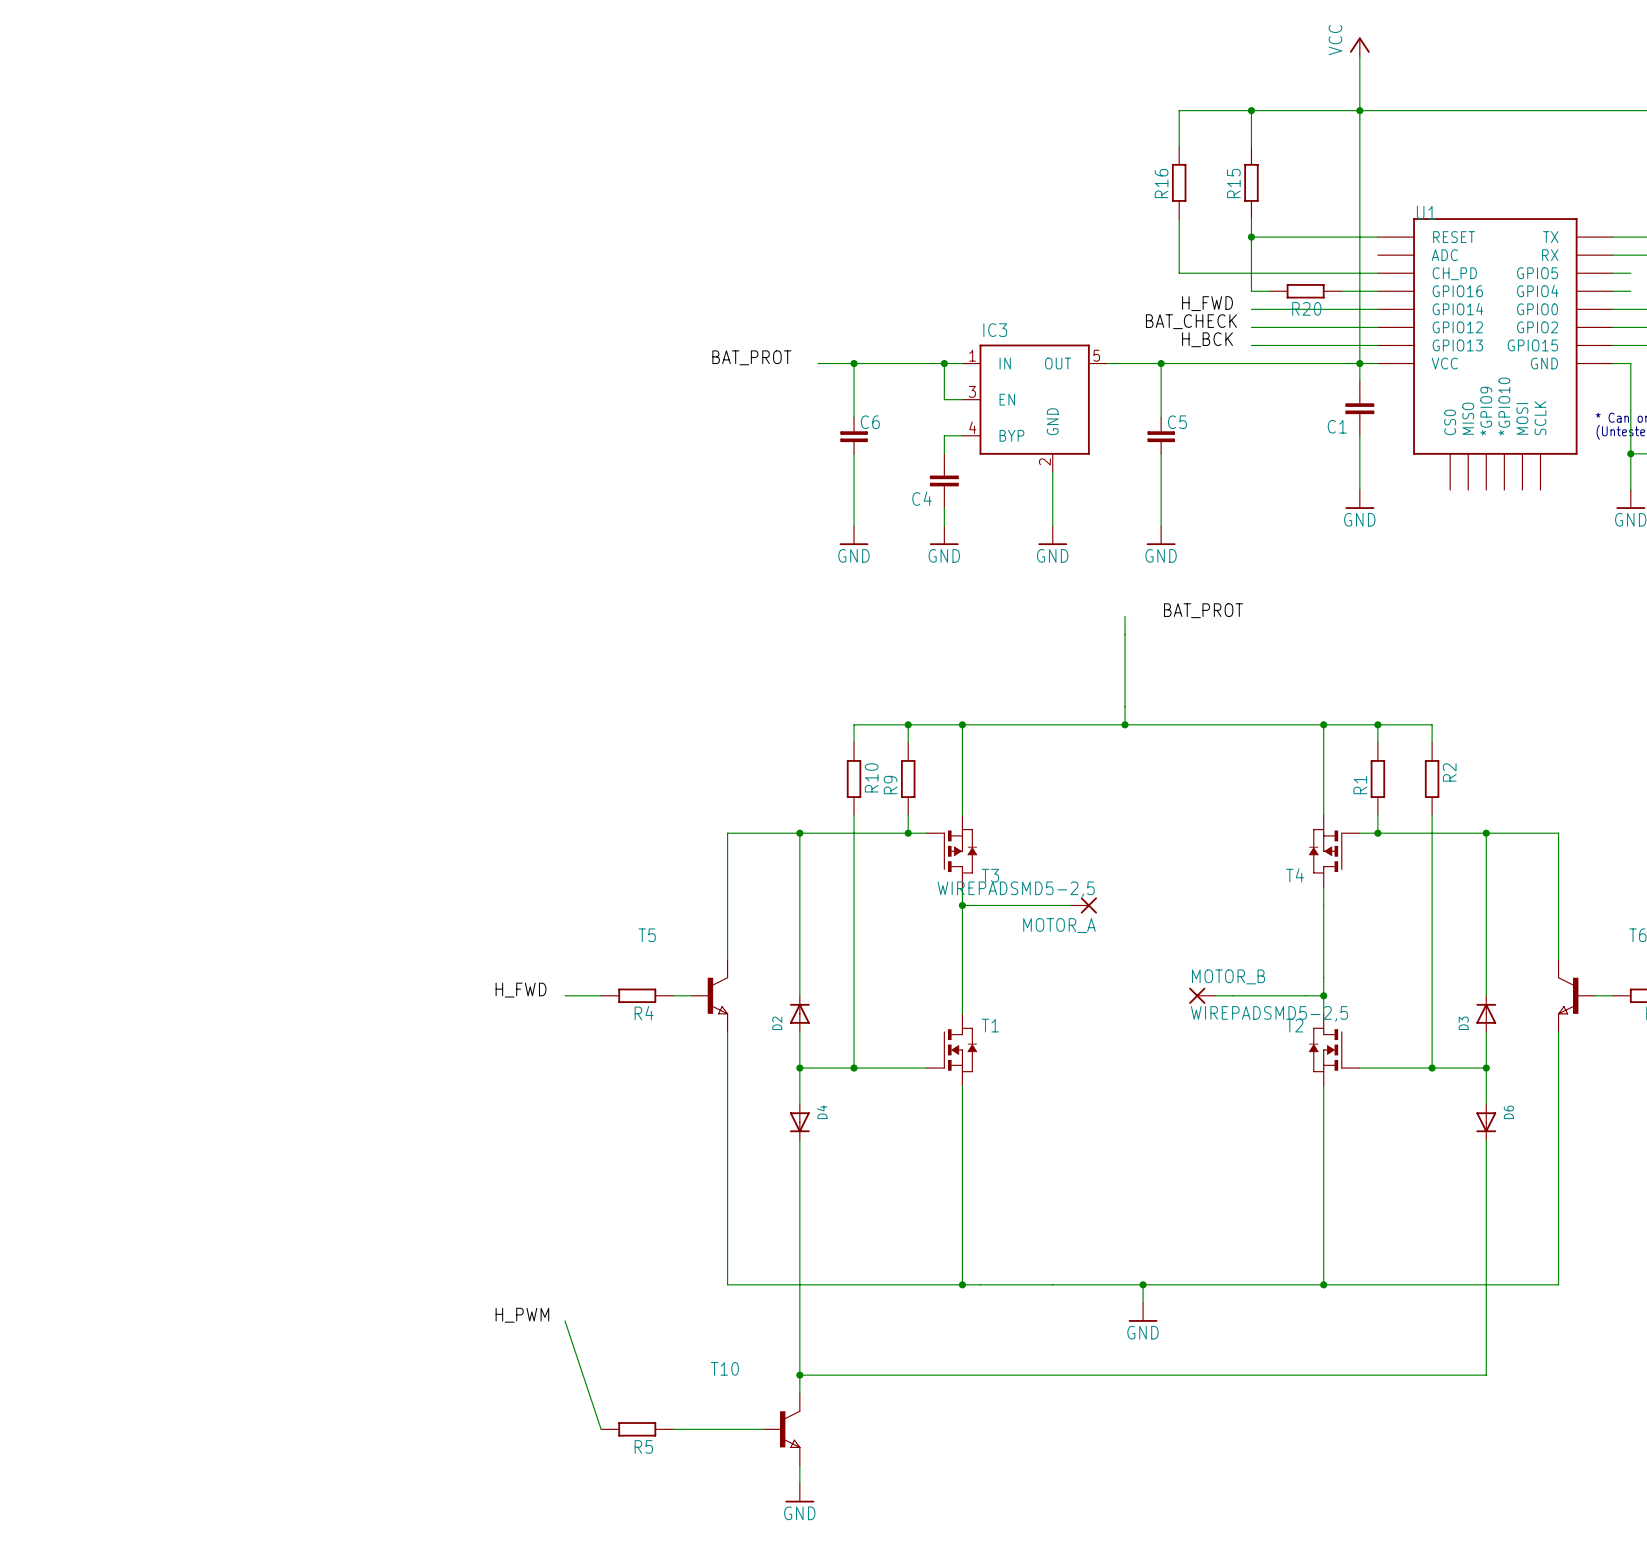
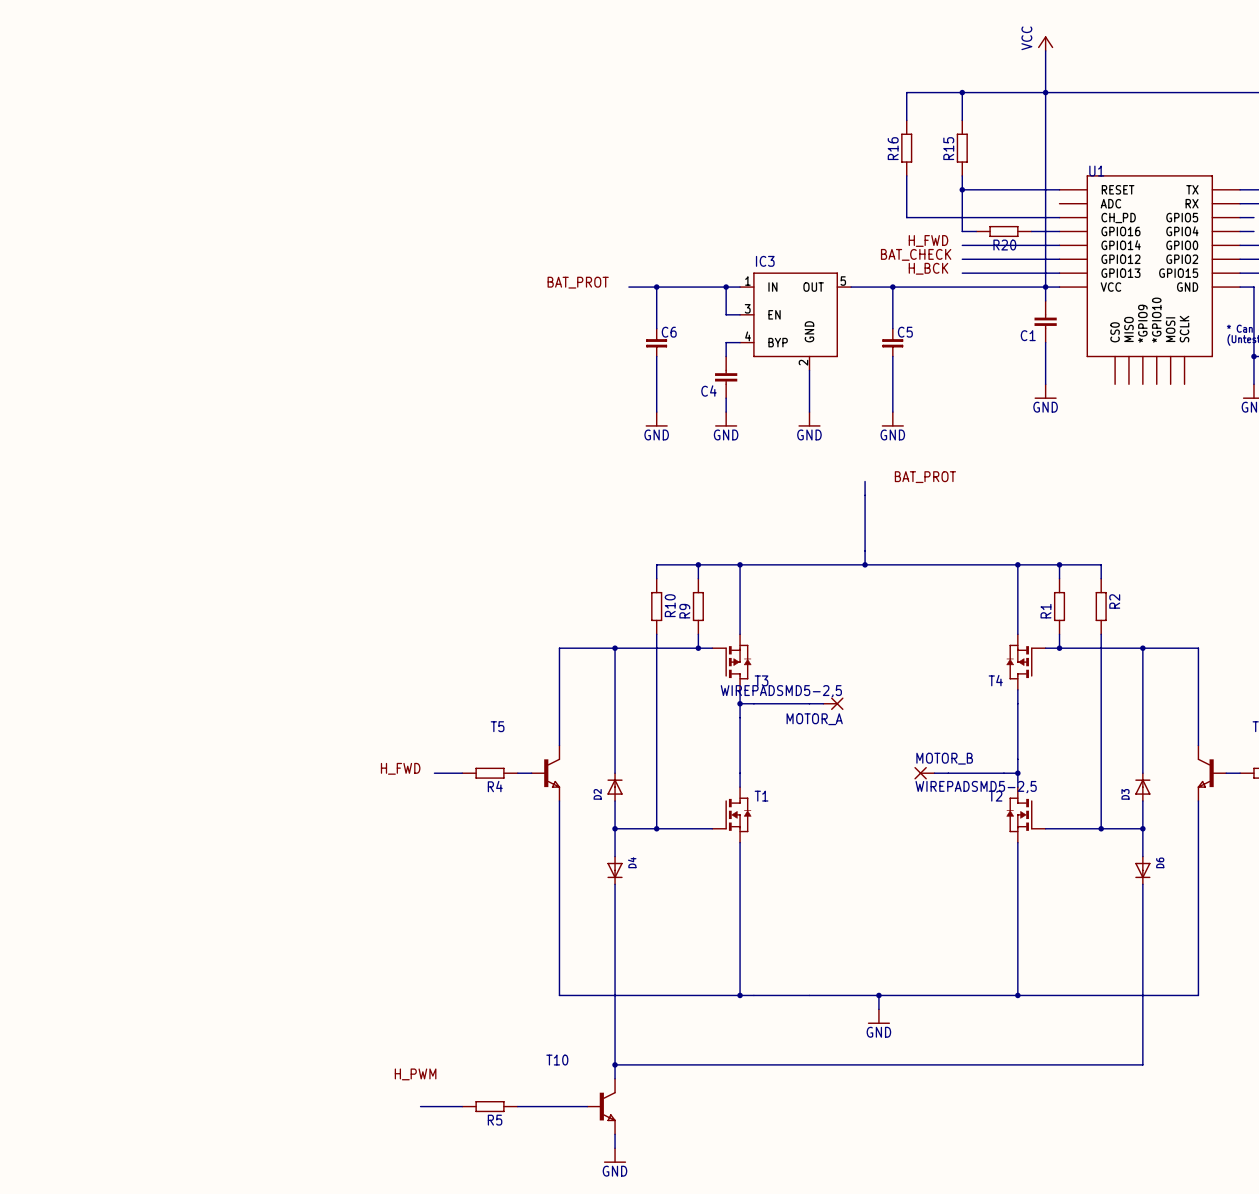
label position: H_PWM (522, 1315) -> H_PWM (415, 1074)
wire: (565, 1320) (601, 1429) -> (420, 1106) (462, 1106)

